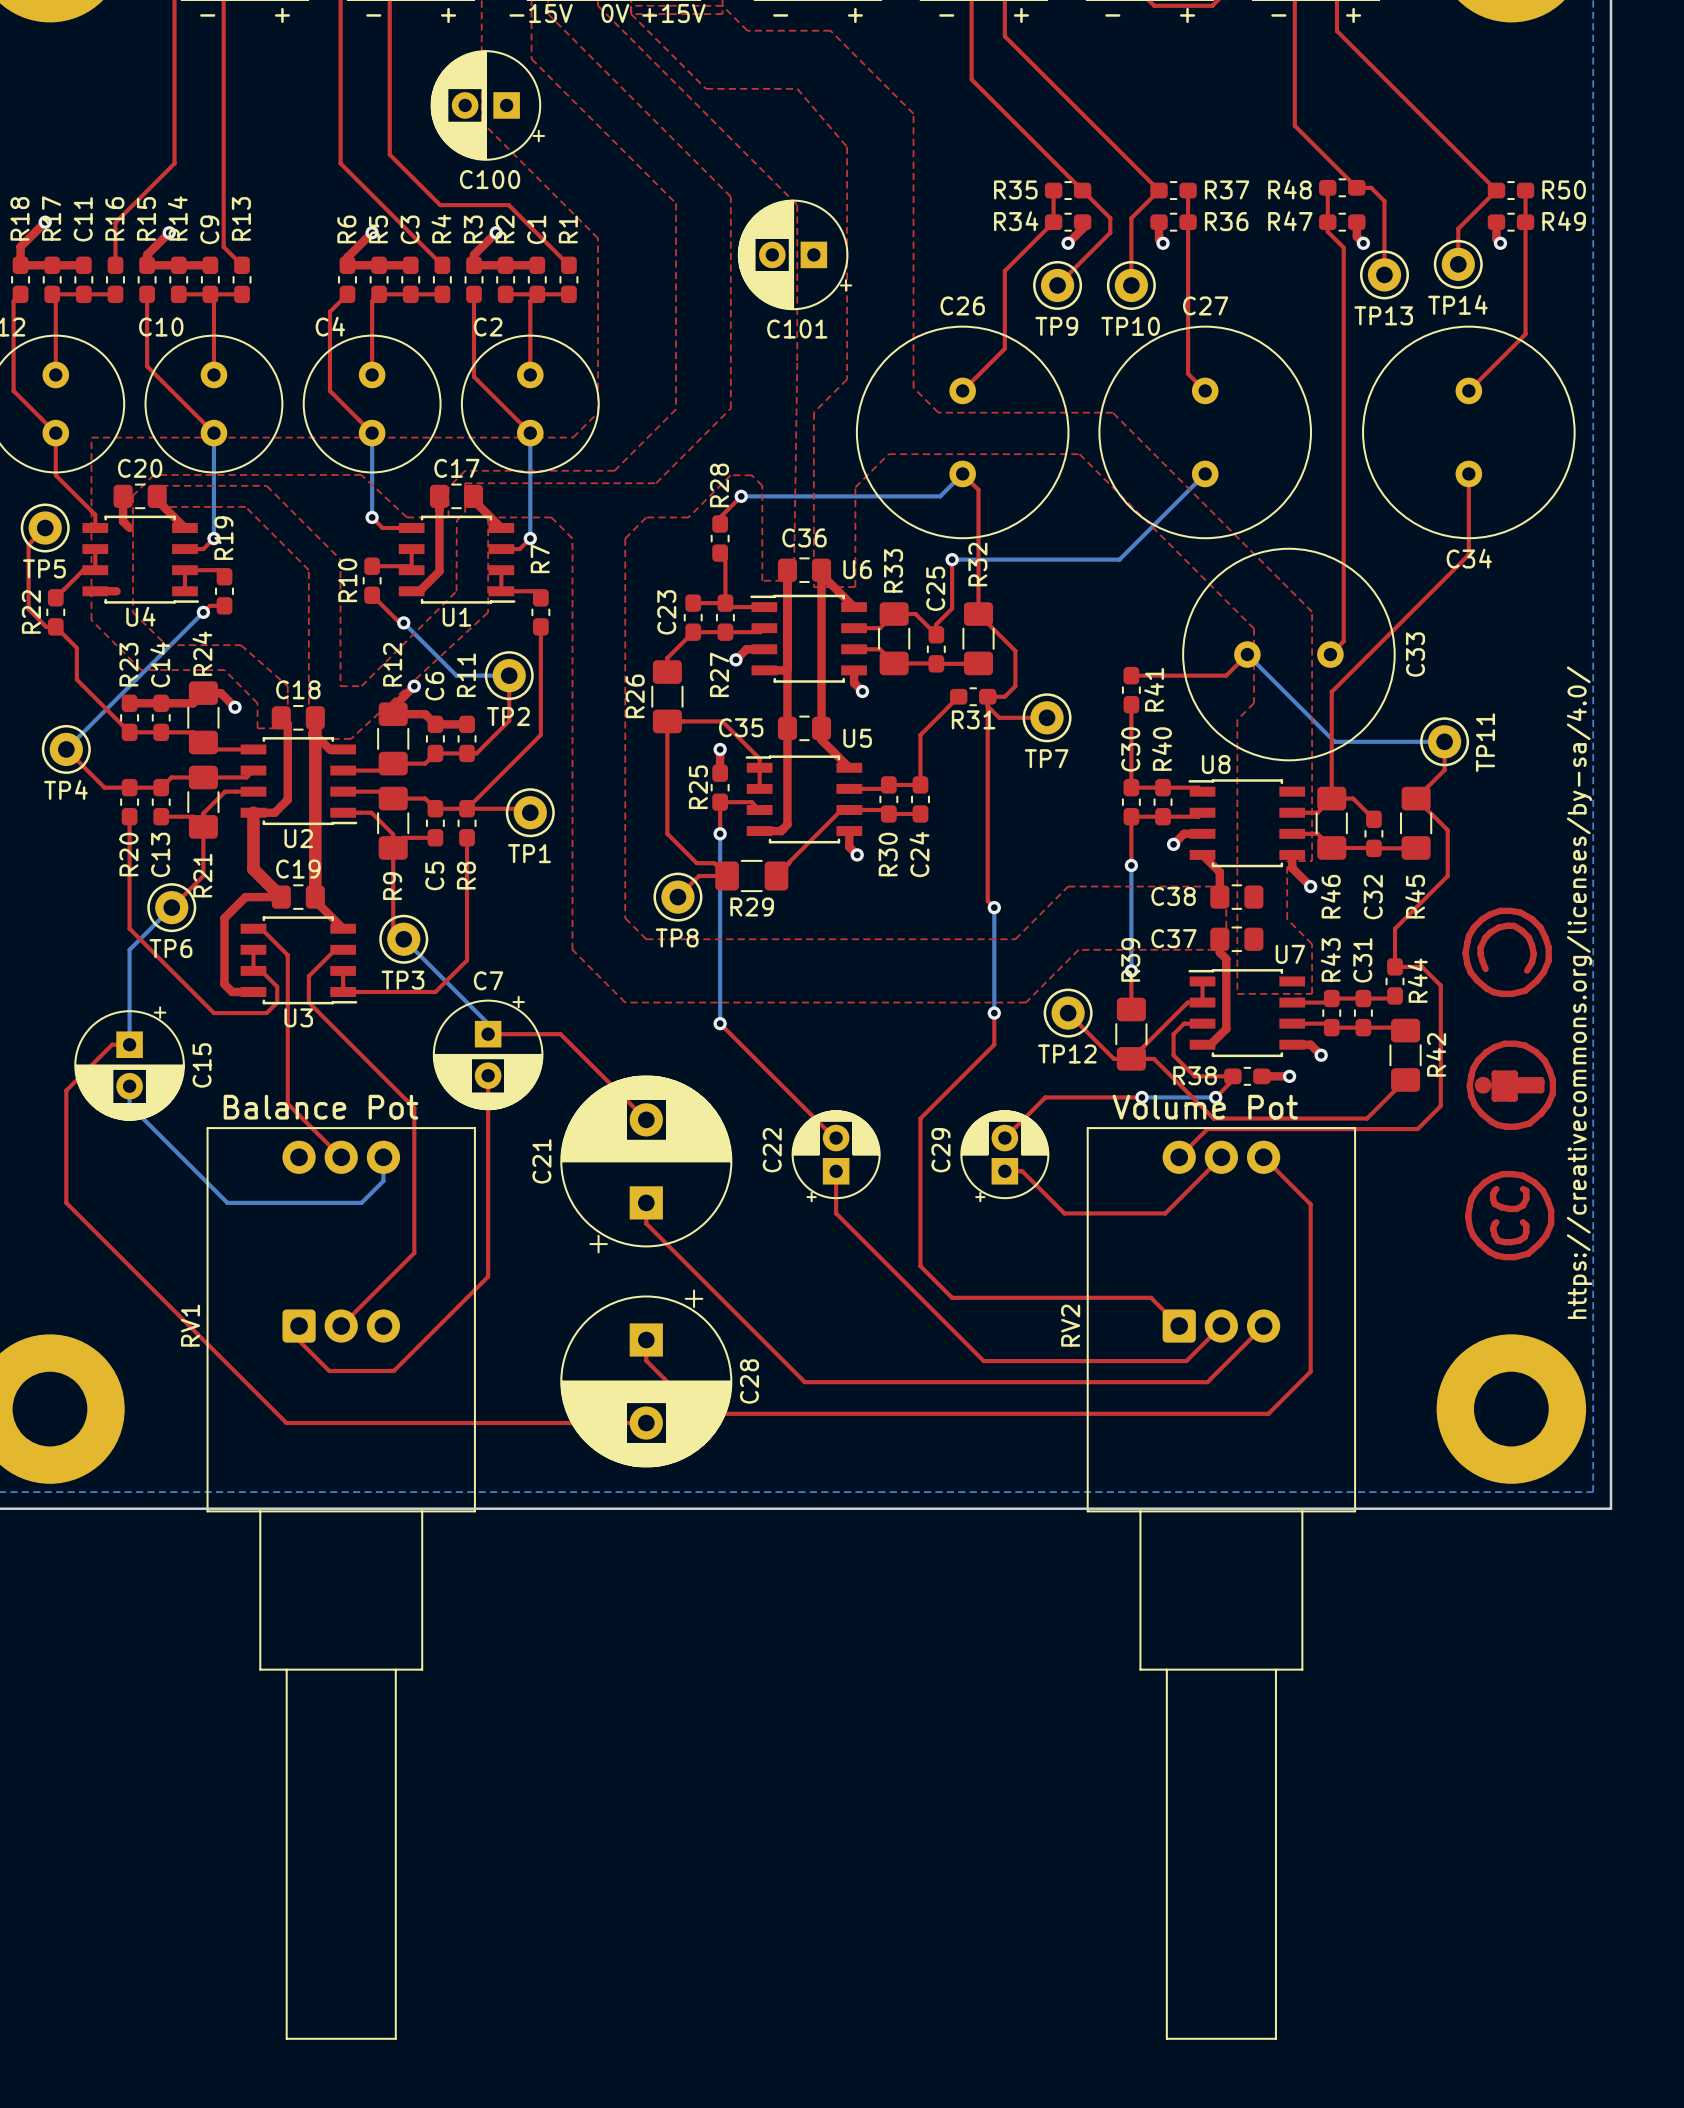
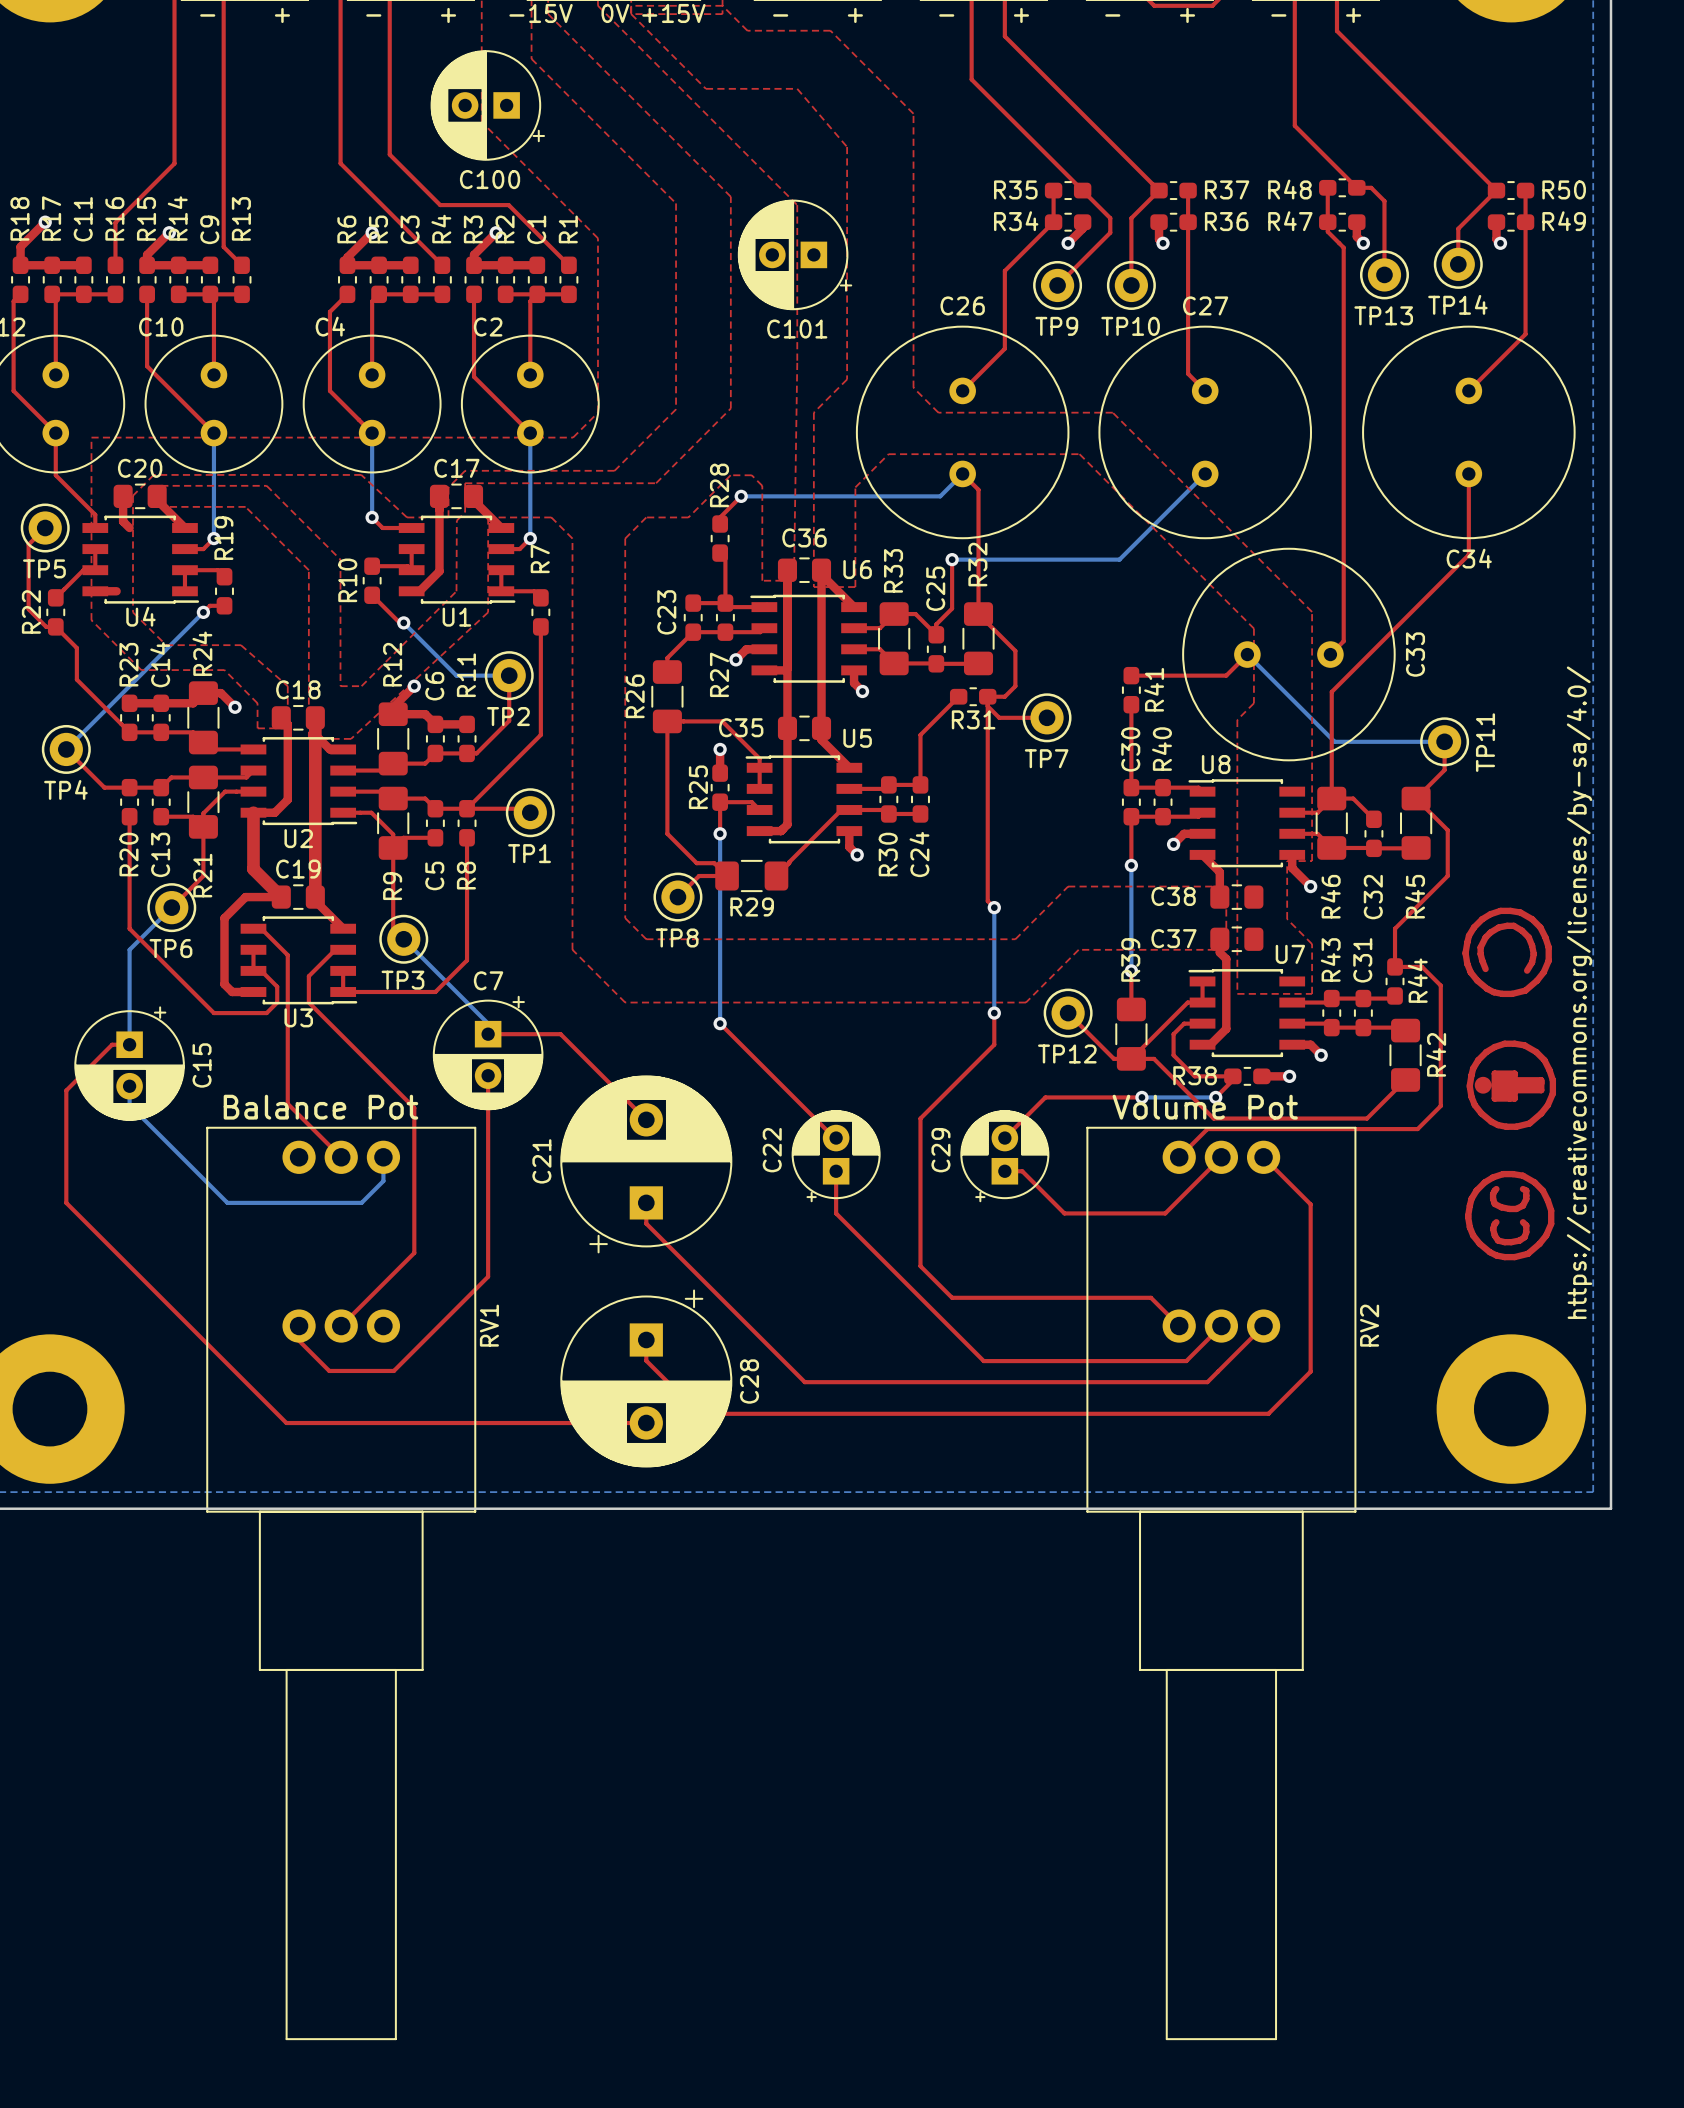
RV1 footprint: [206, 1127, 476, 2040] -> [206, 1126, 477, 2041]
RV2 footprint: [1086, 1127, 1357, 2040] -> [1086, 1126, 1357, 2041]
RV1 name position: RV1 (190, 1325) -> RV1 (489, 1325)
RV2 name position: RV2 (1070, 1325) -> RV2 (1369, 1325)

